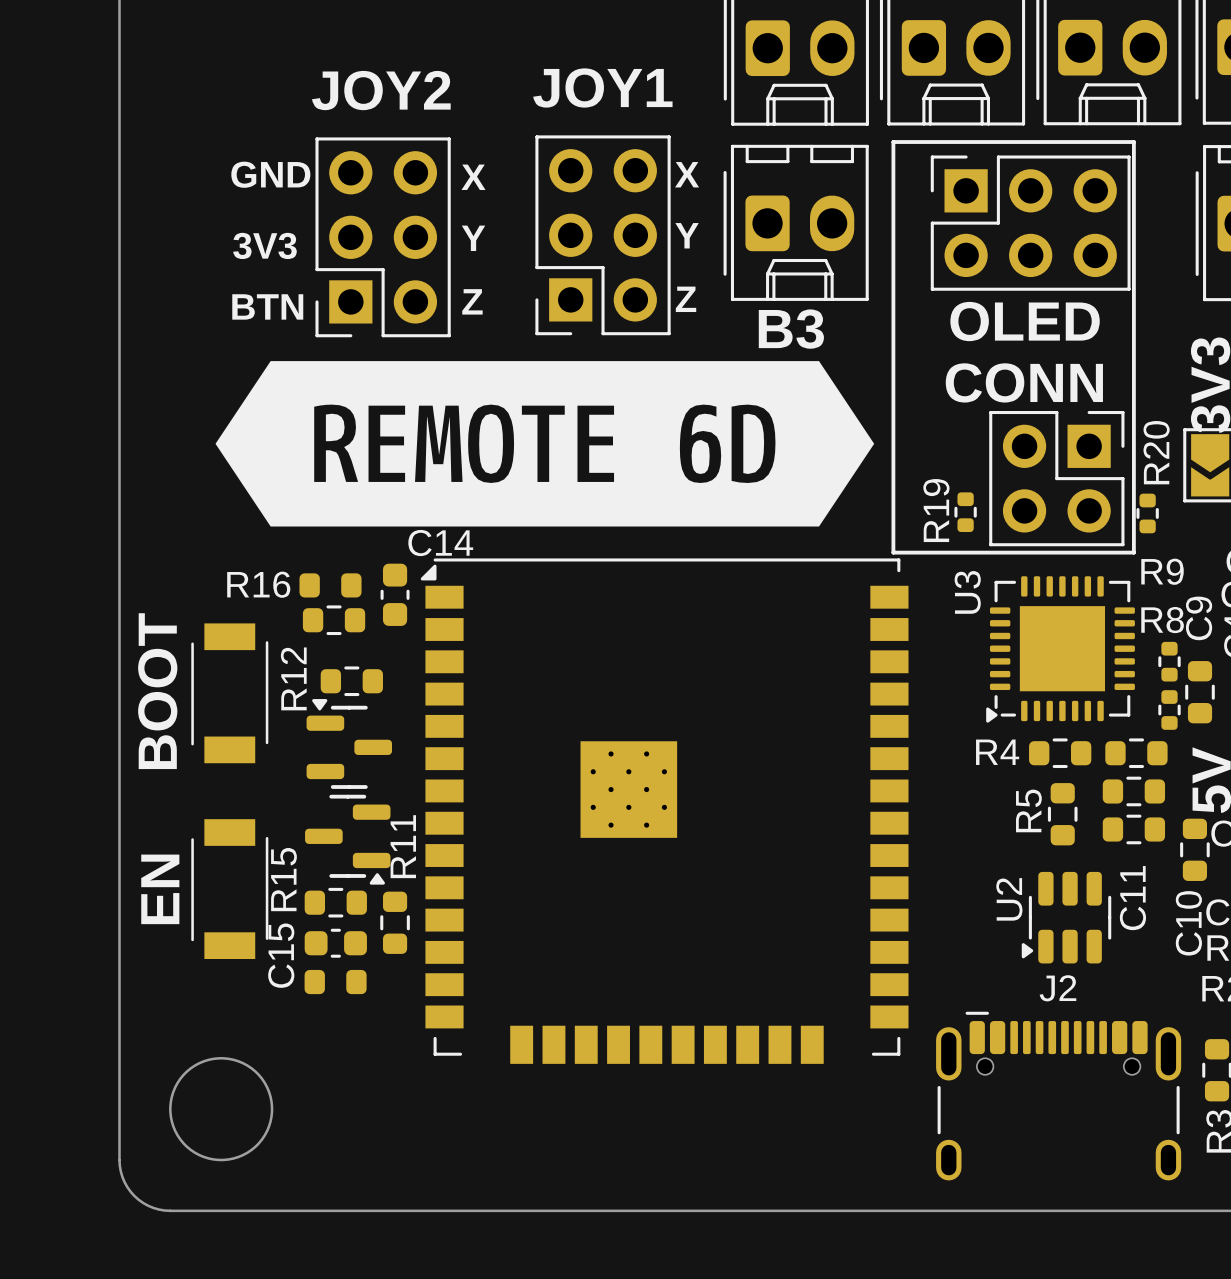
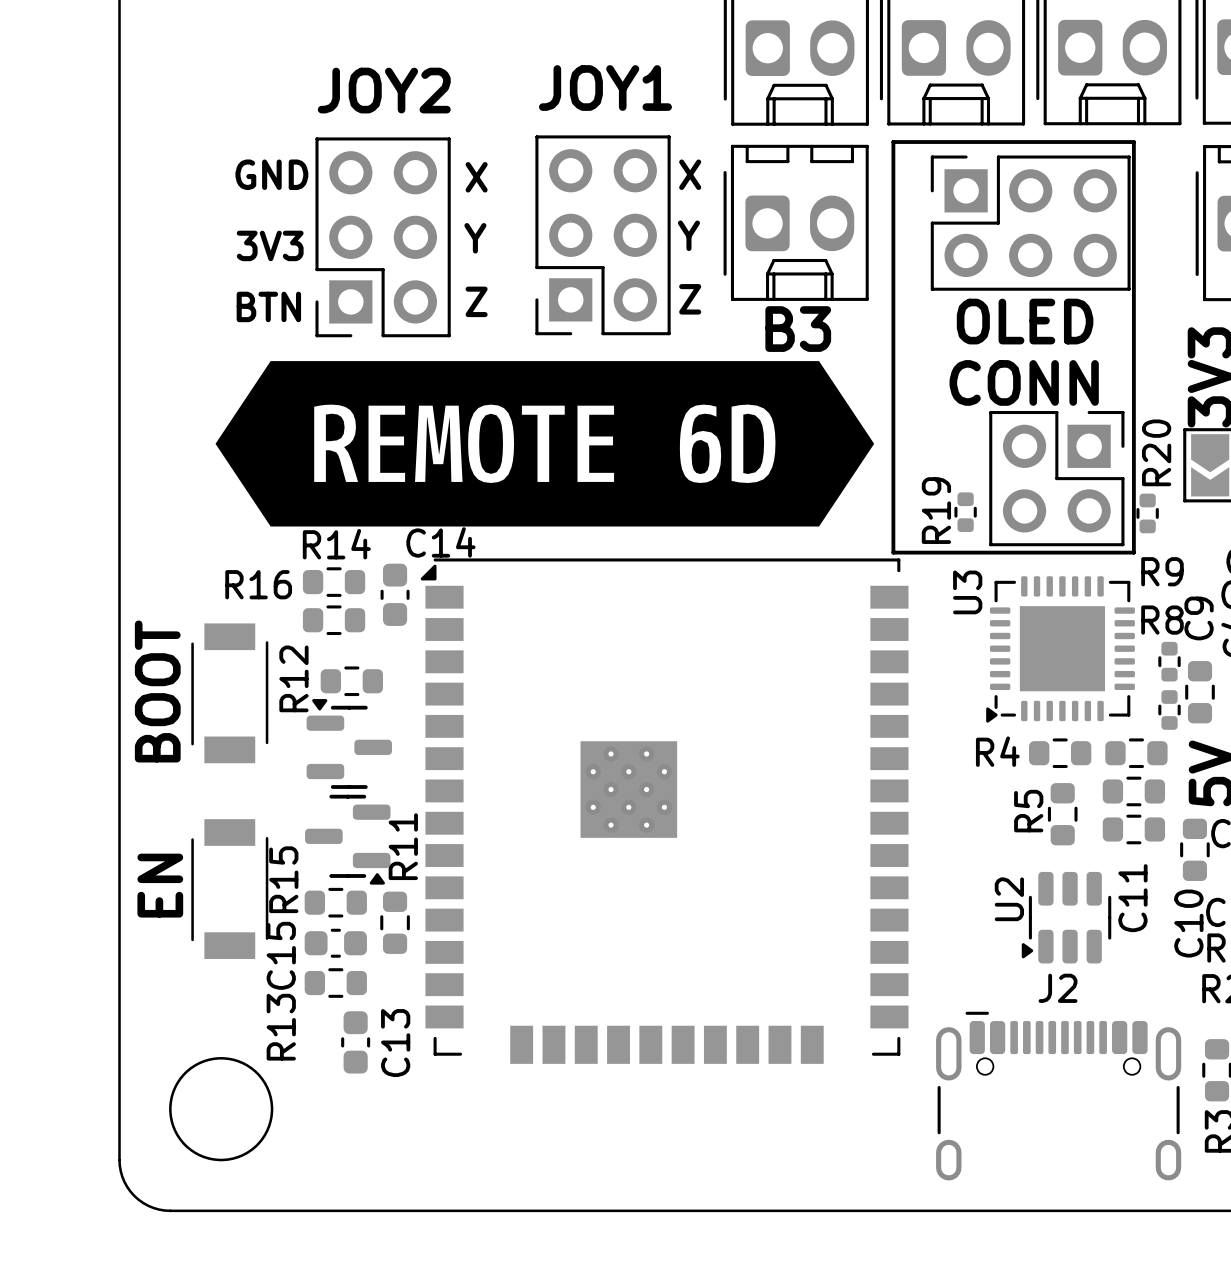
R14: none -> (334, 582)
part: (330, 585) -> none
part: (335, 982) -> none
R13: none -> (335, 983)
C13: none -> (355, 1042)

